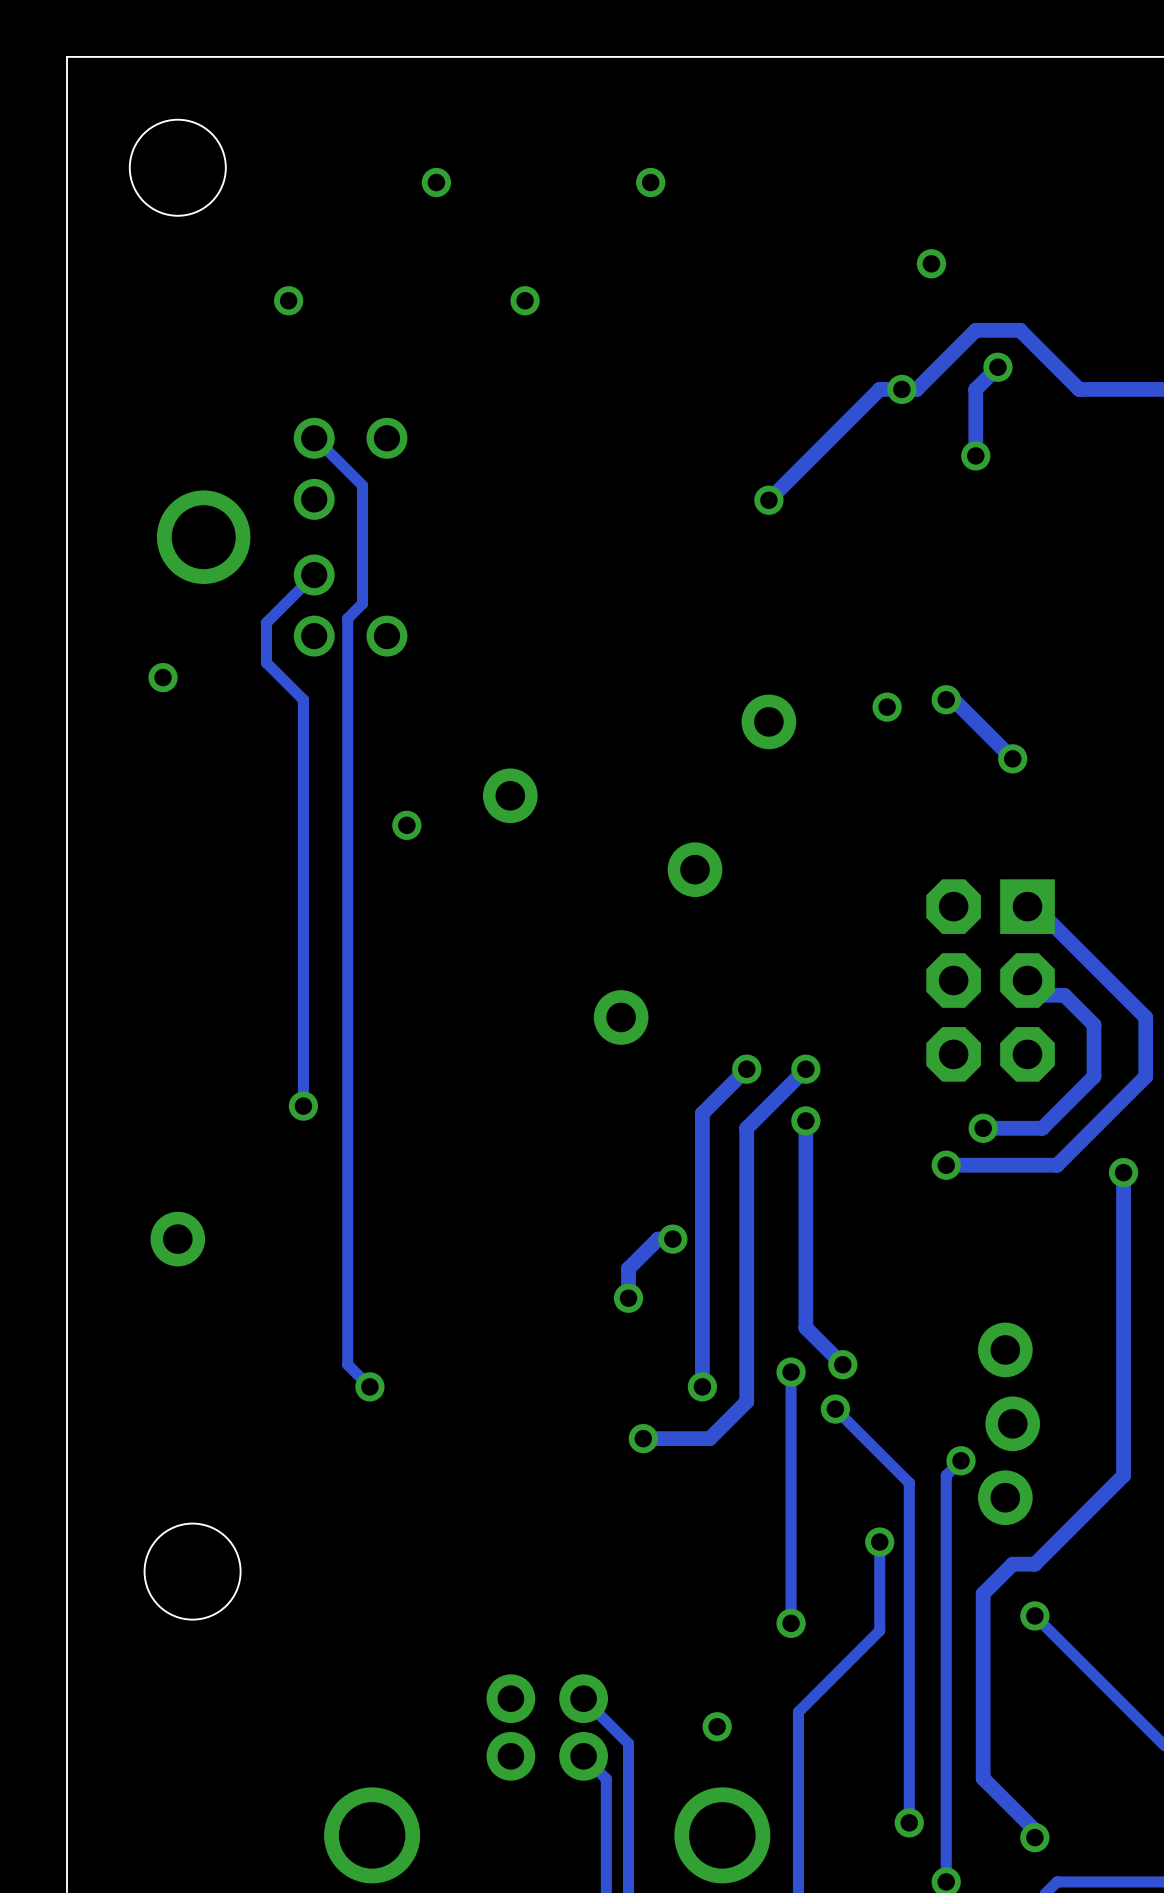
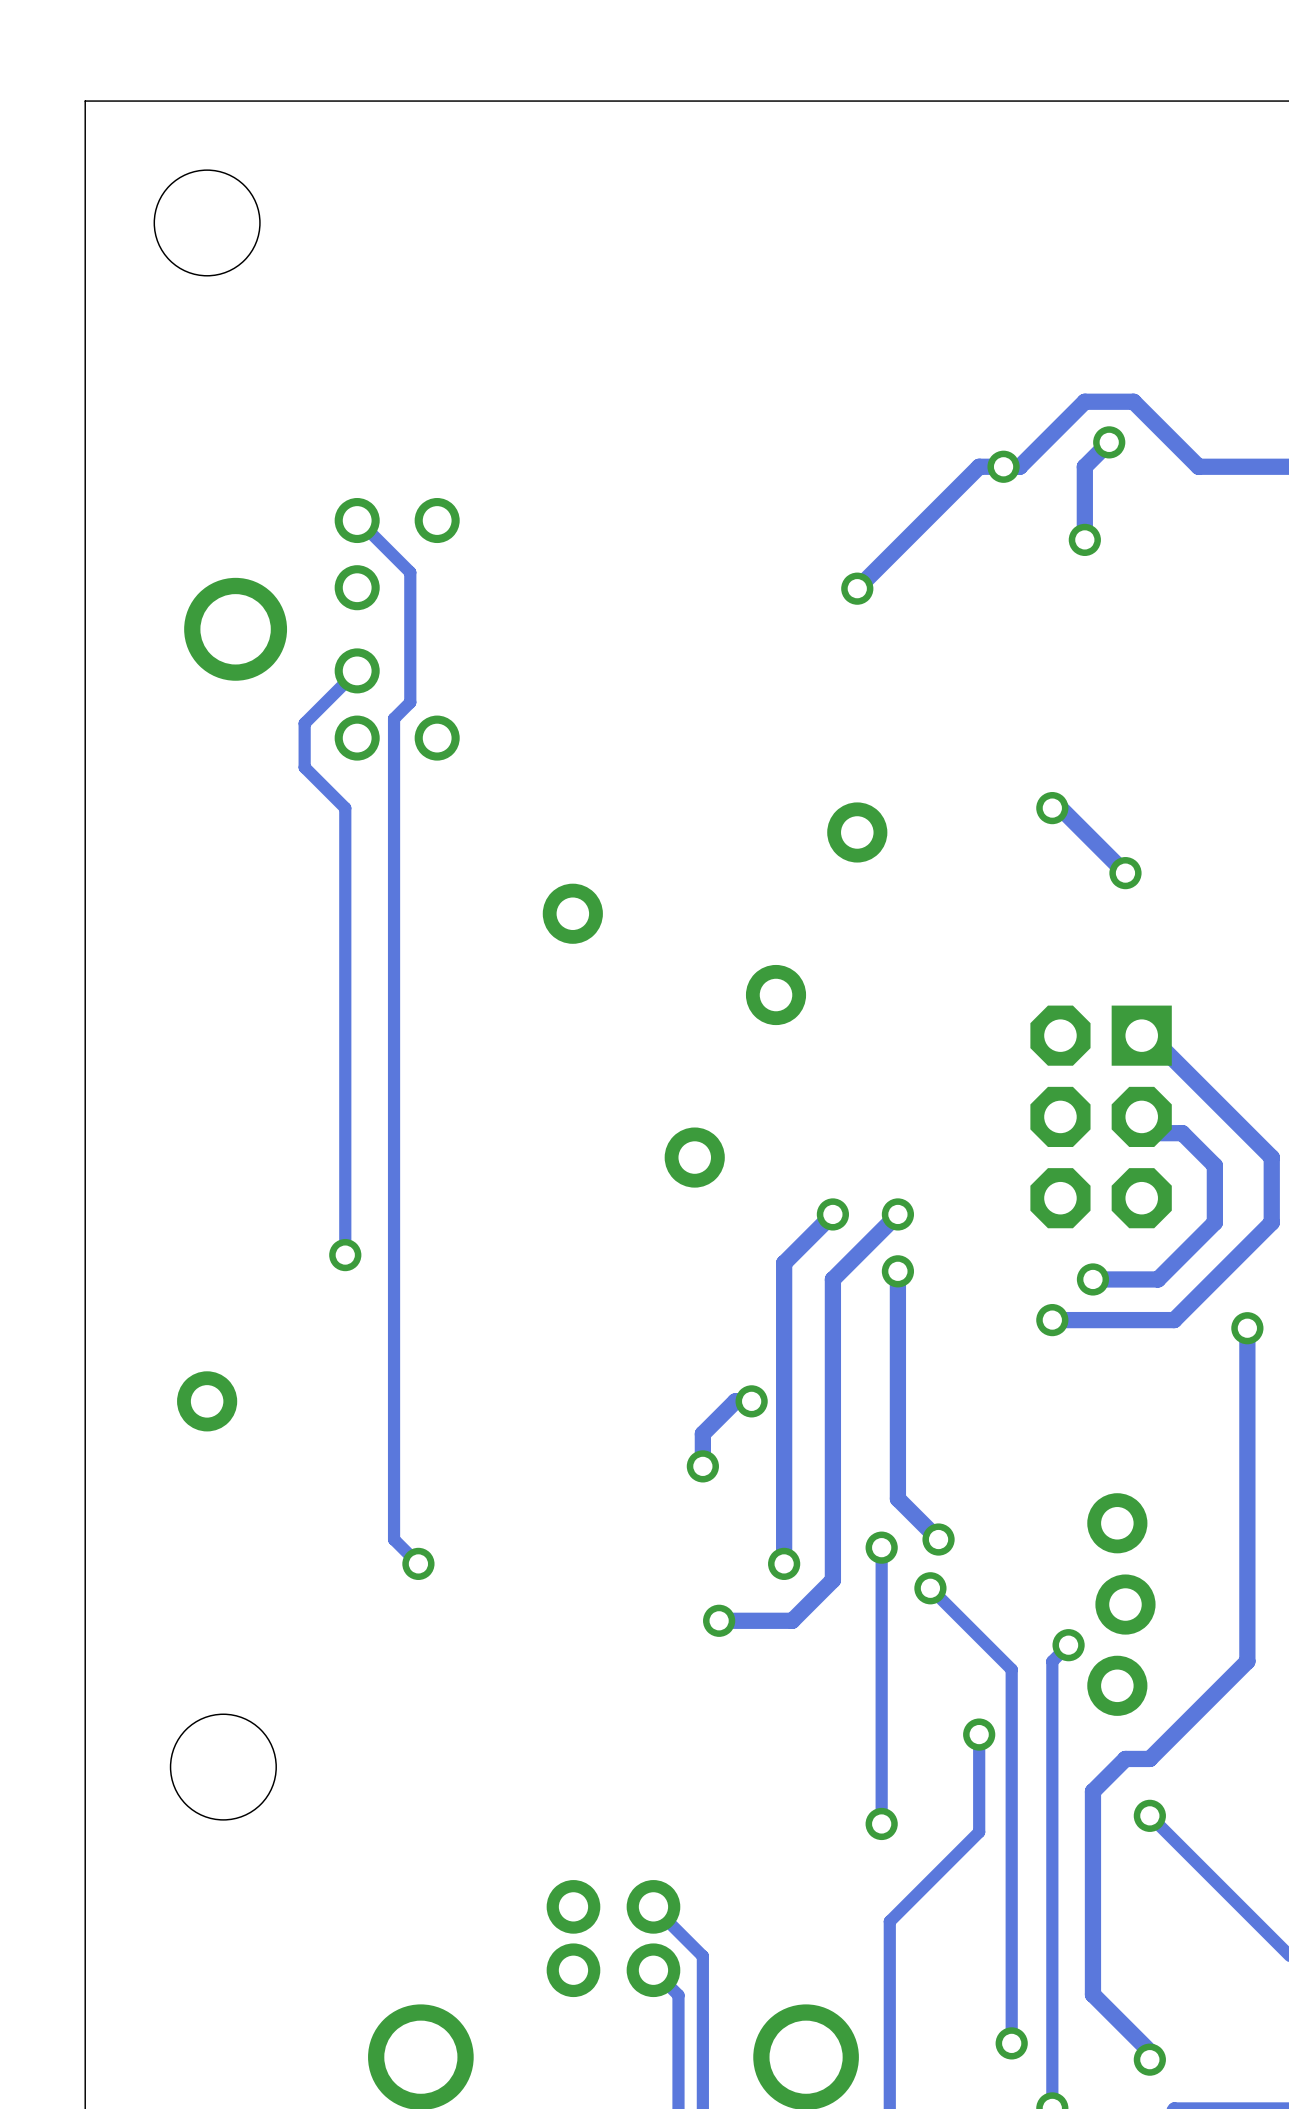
via: (436, 182) -> none
via: (650, 182) -> none
via: (931, 263) -> none
via: (288, 300) -> none
via: (525, 300) -> none
via: (163, 677) -> none
via: (887, 707) -> none
via: (406, 825) -> none
via: (717, 1726) -> none

